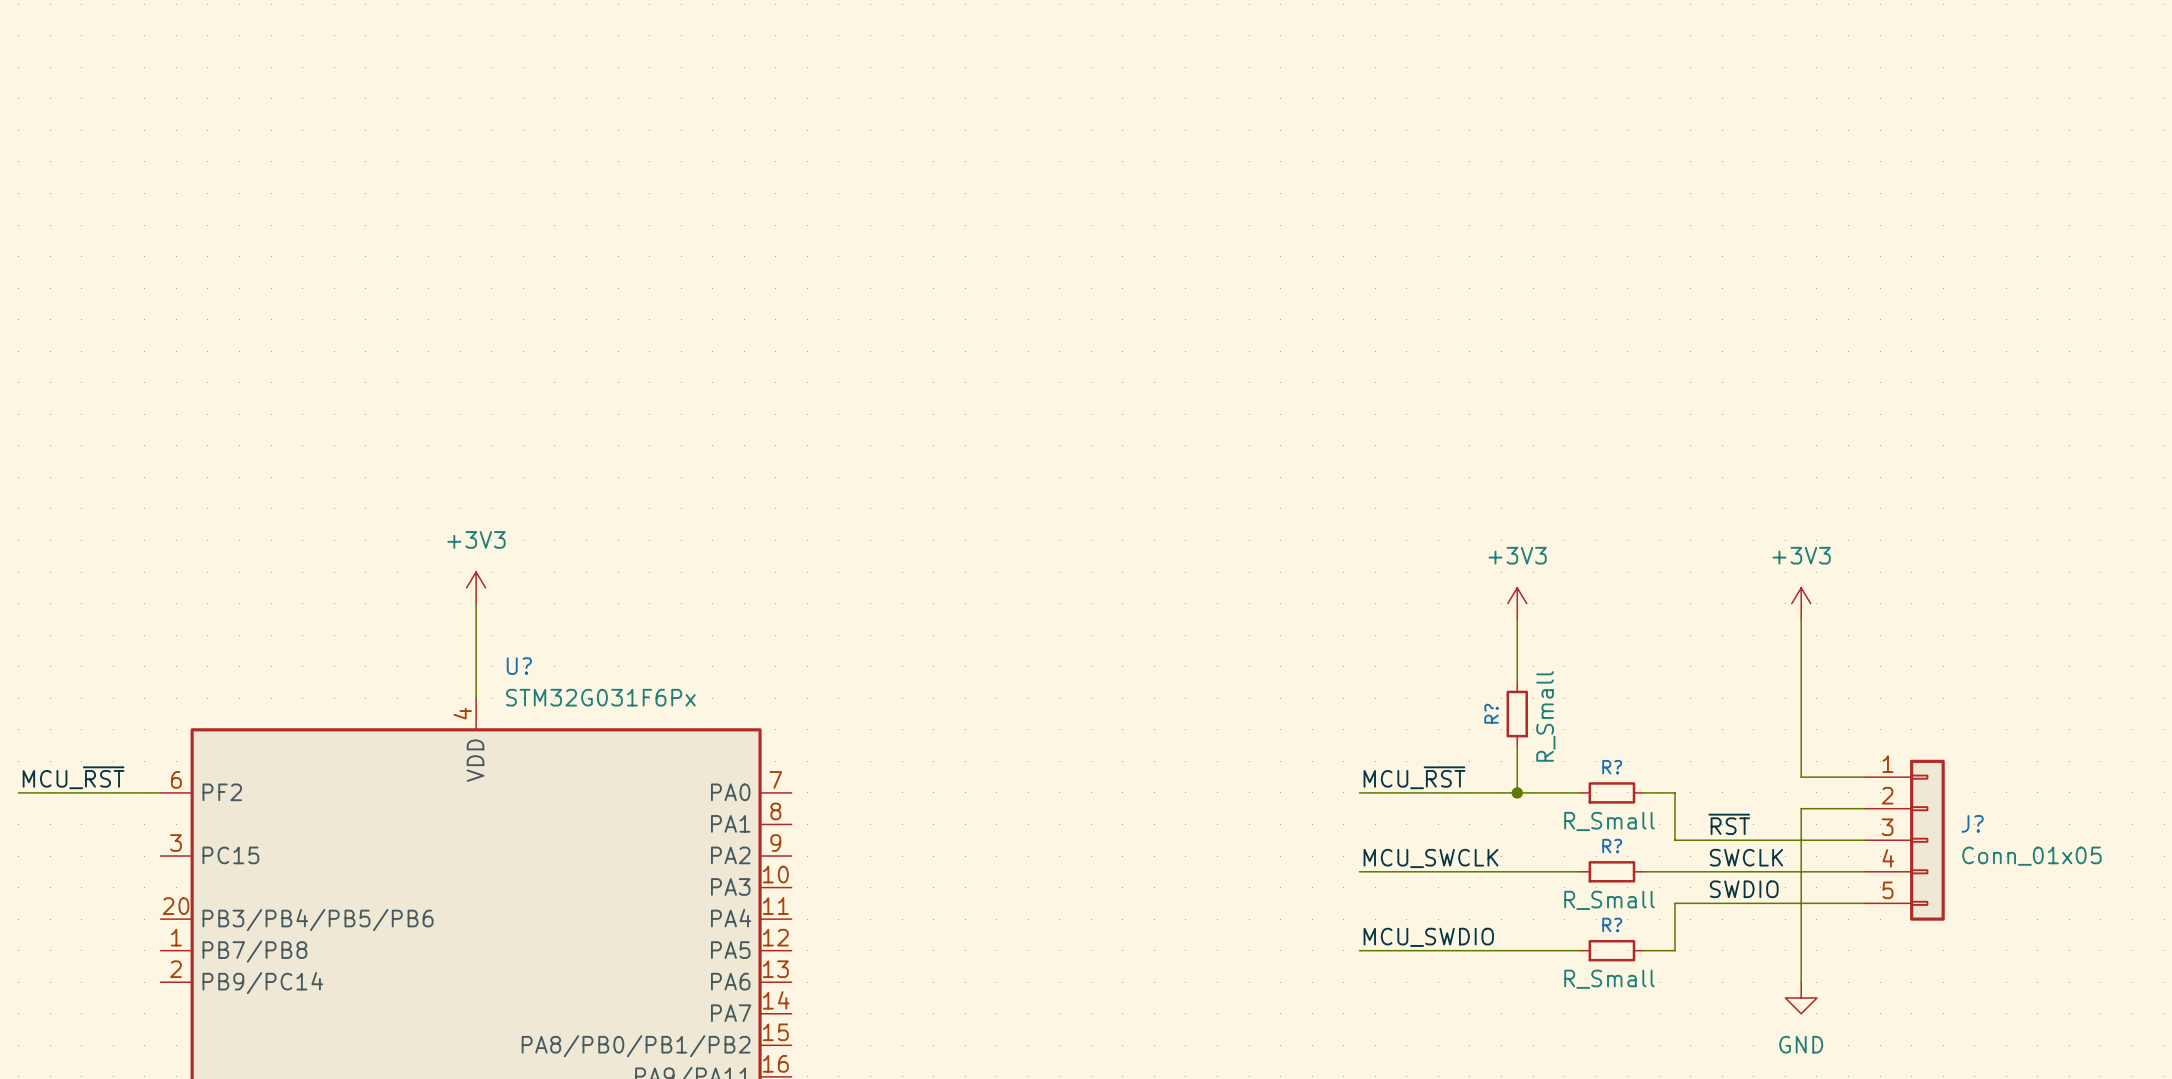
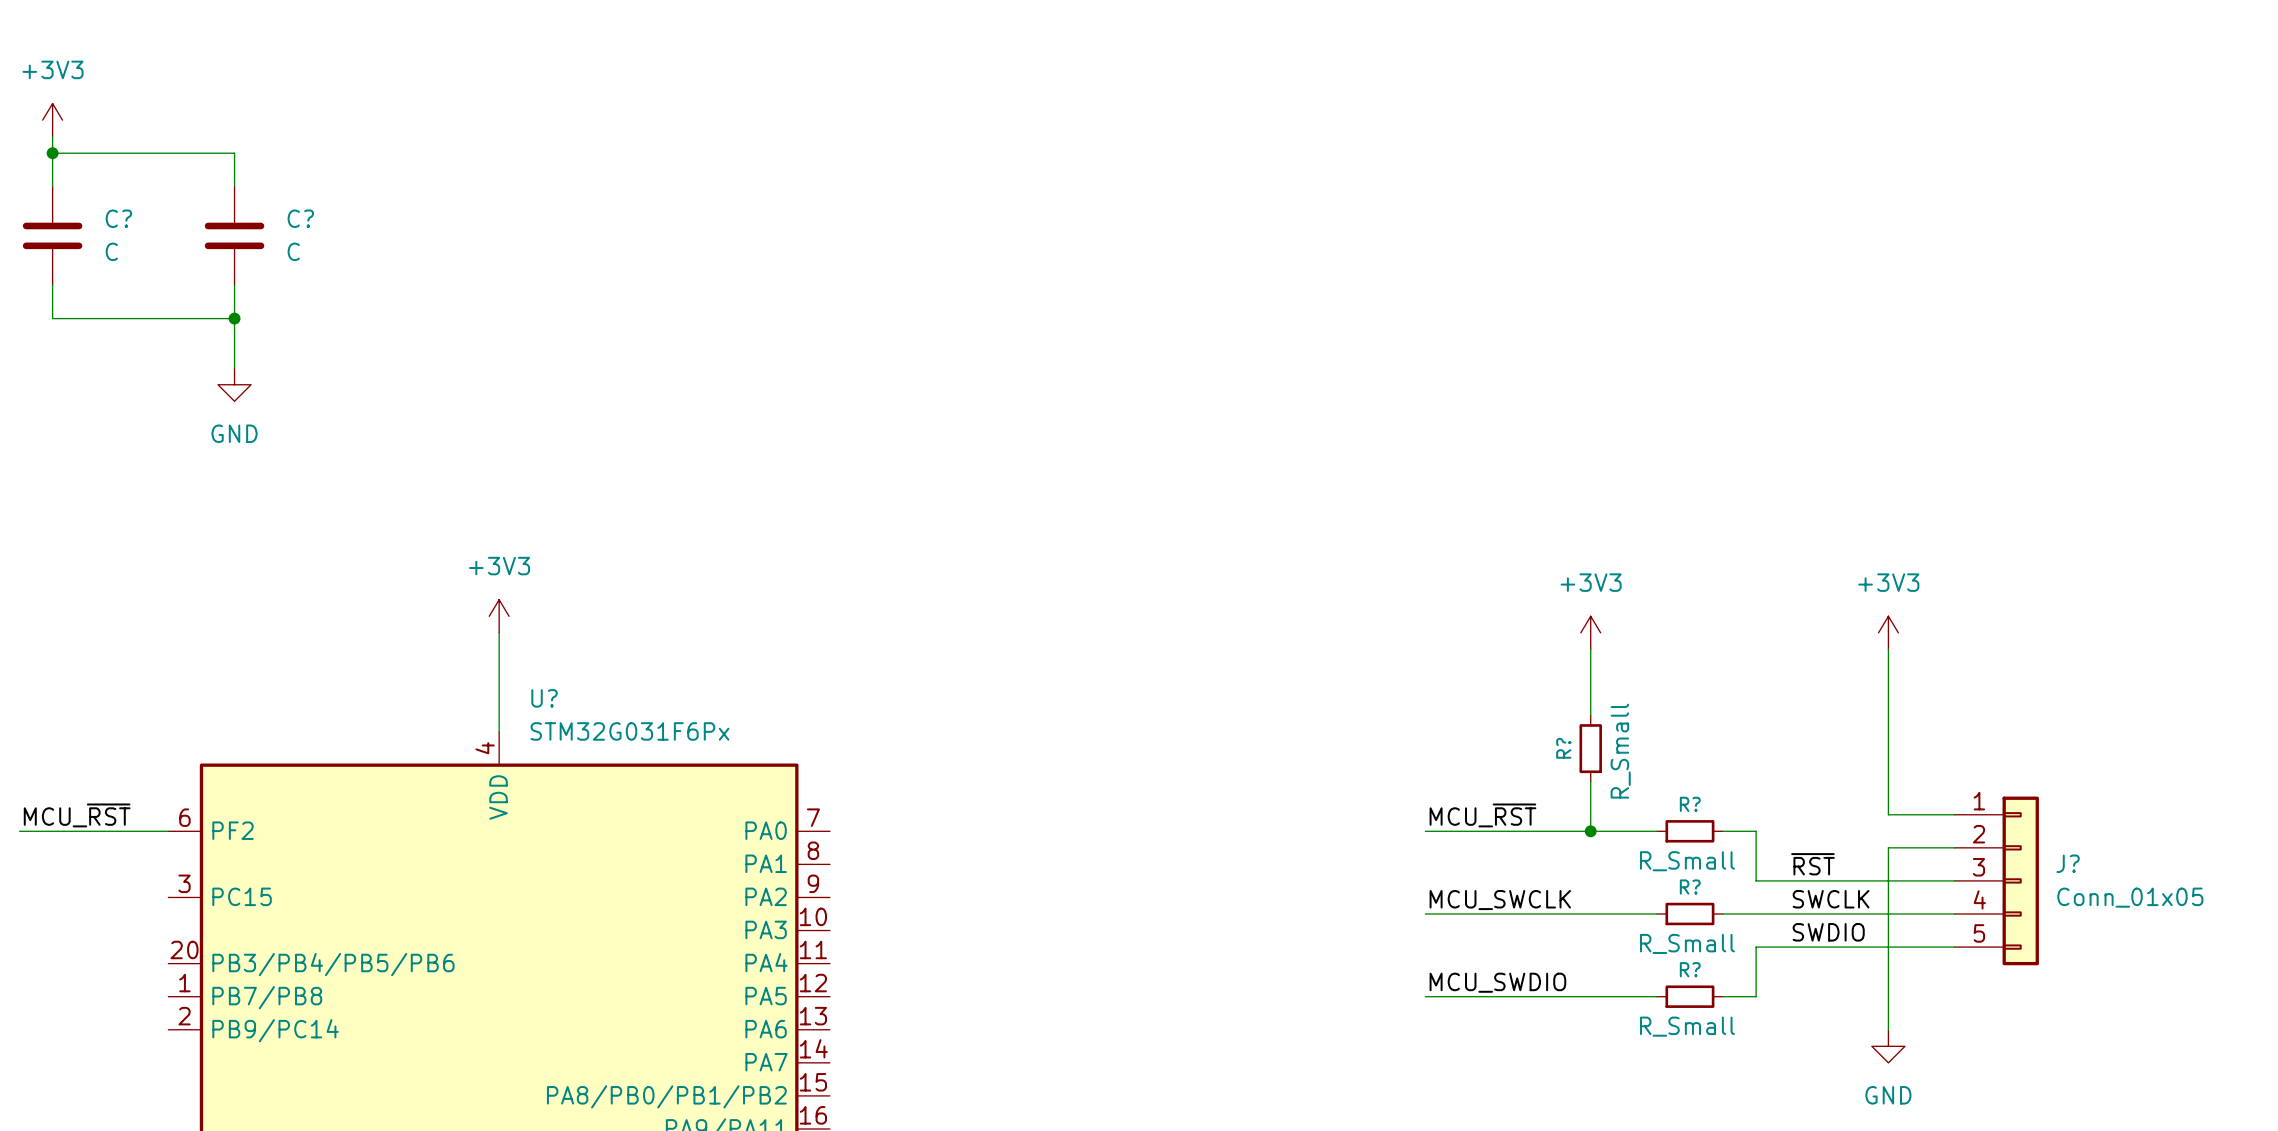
power symbol: none -> +3V3 (52, 120)
wire: none -> (52, 136) (52, 186)
wire: none -> (52, 153) (234, 153) (234, 186)
junction: none -> (52, 153)
C?: none -> C (52, 235)
C?: none -> C (234, 235)
wire: none -> (52, 285) (52, 318) (234, 318)
wire: none -> (234, 285) (234, 368)
junction: none -> (234, 318)
power symbol: none -> GND (234, 384)

